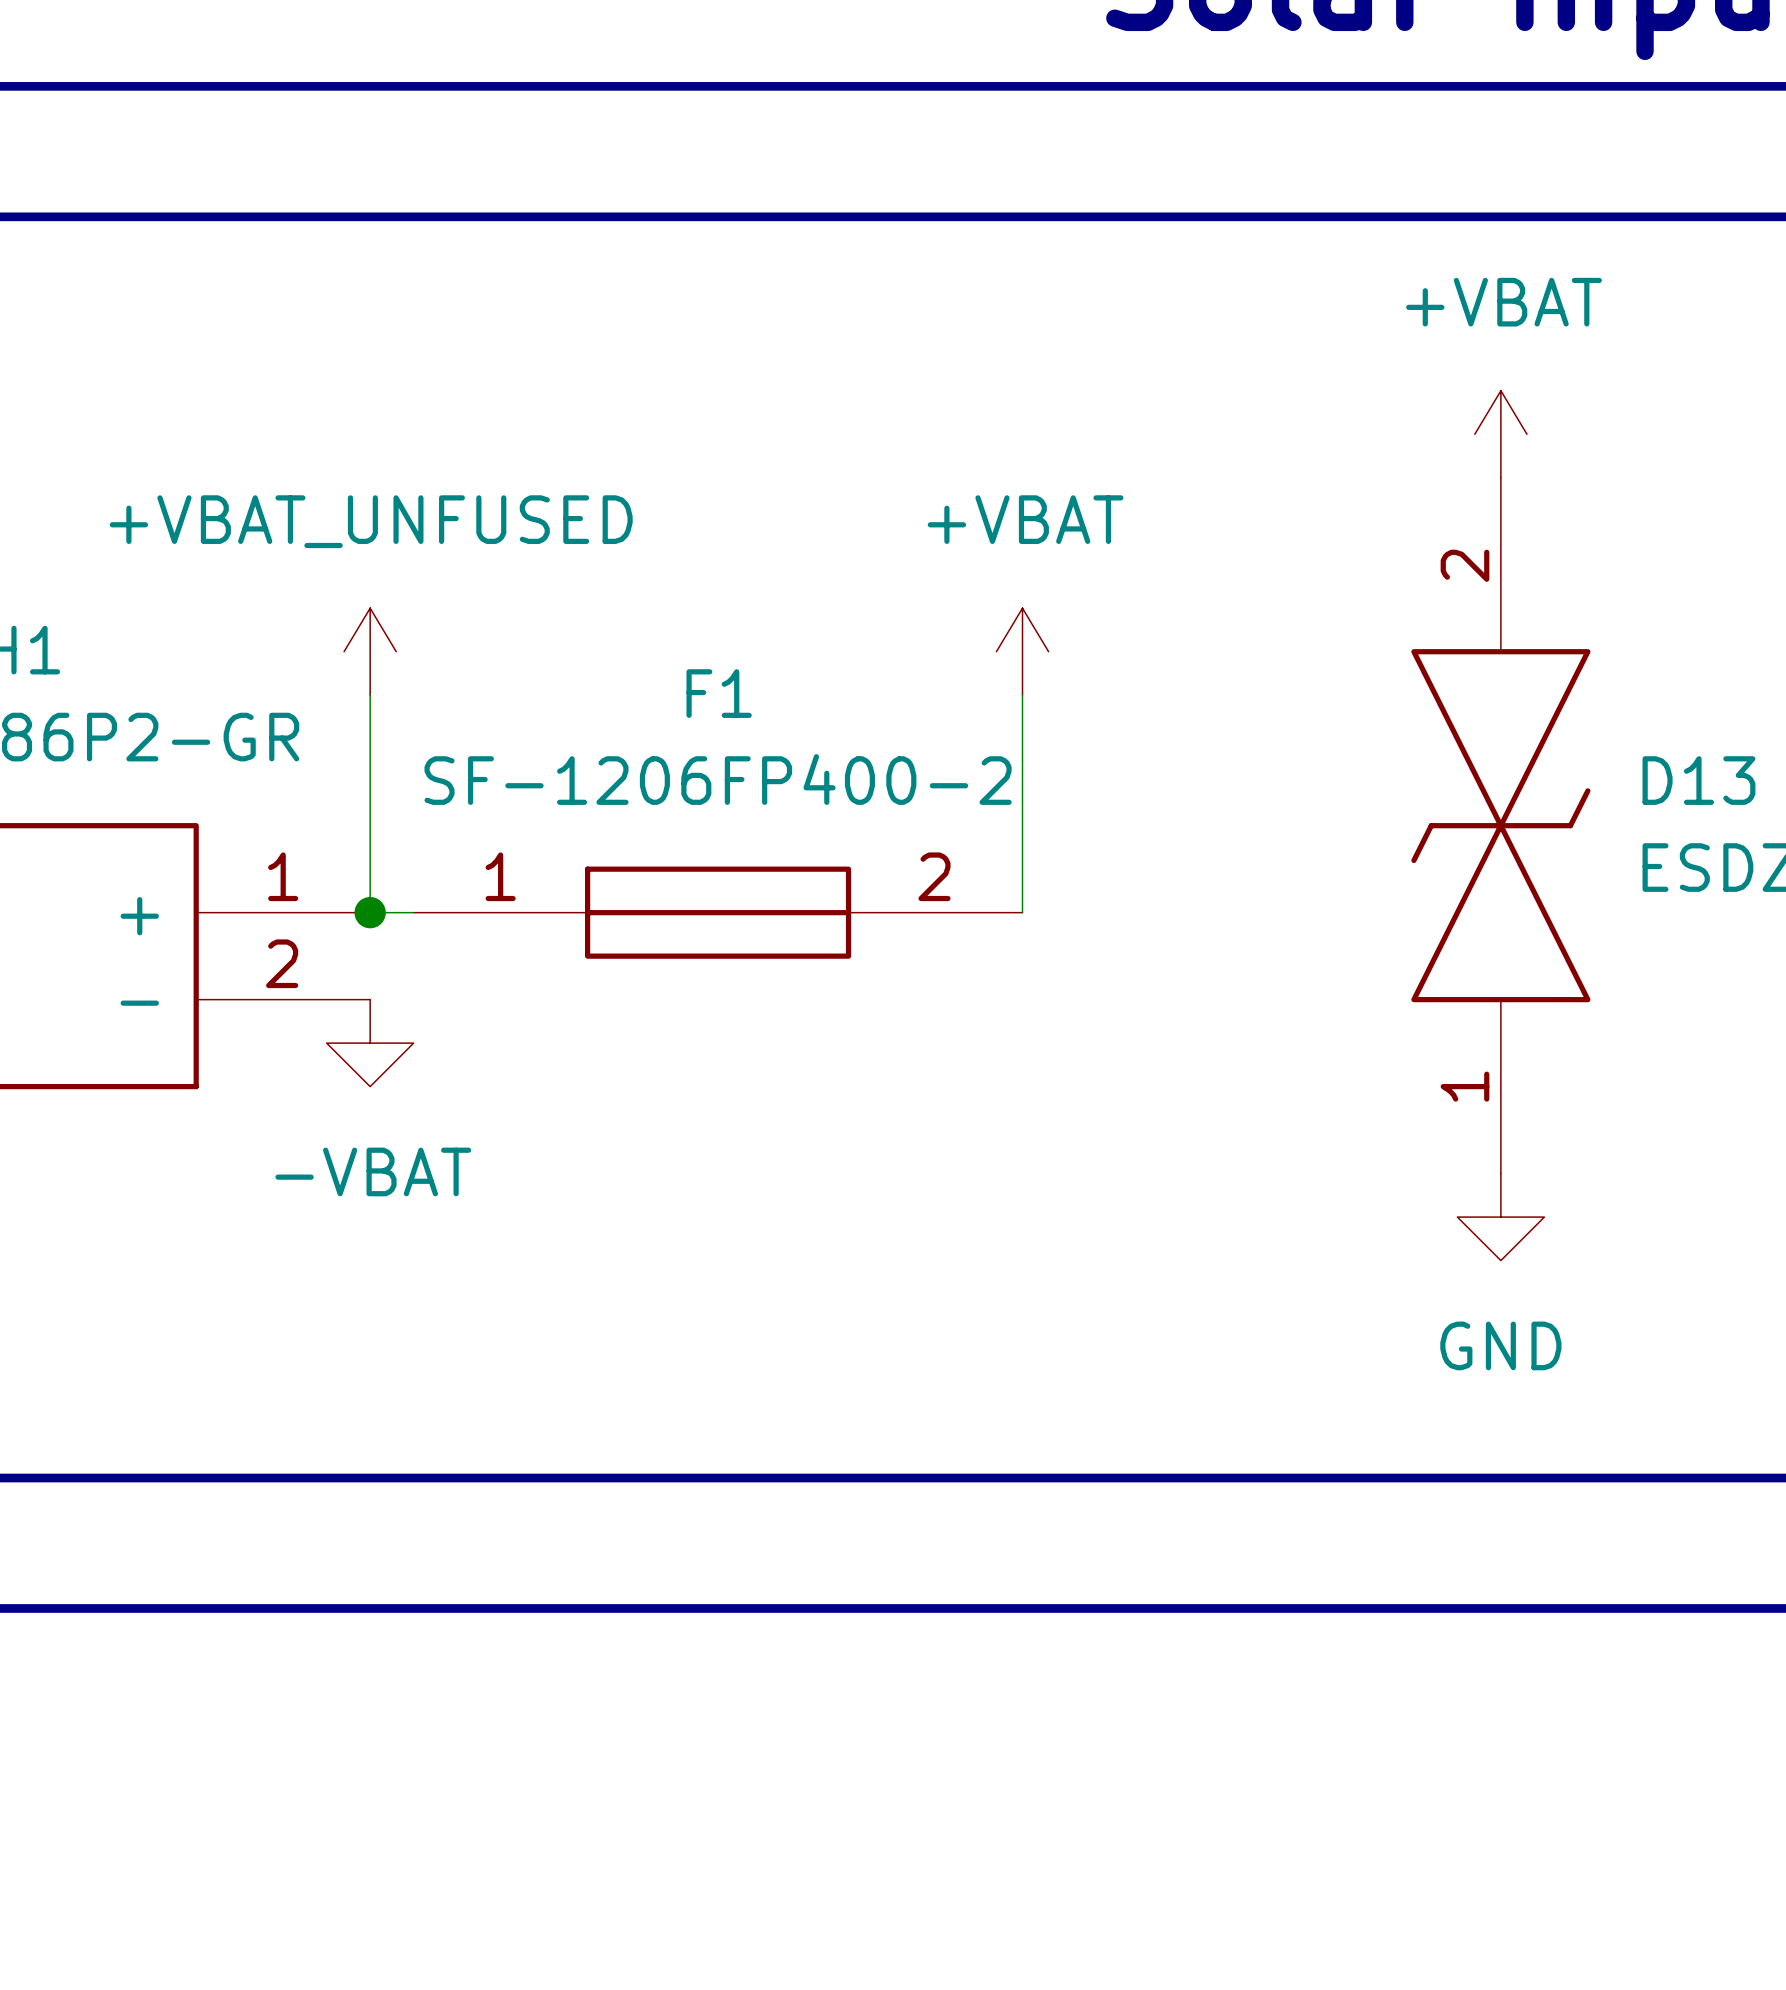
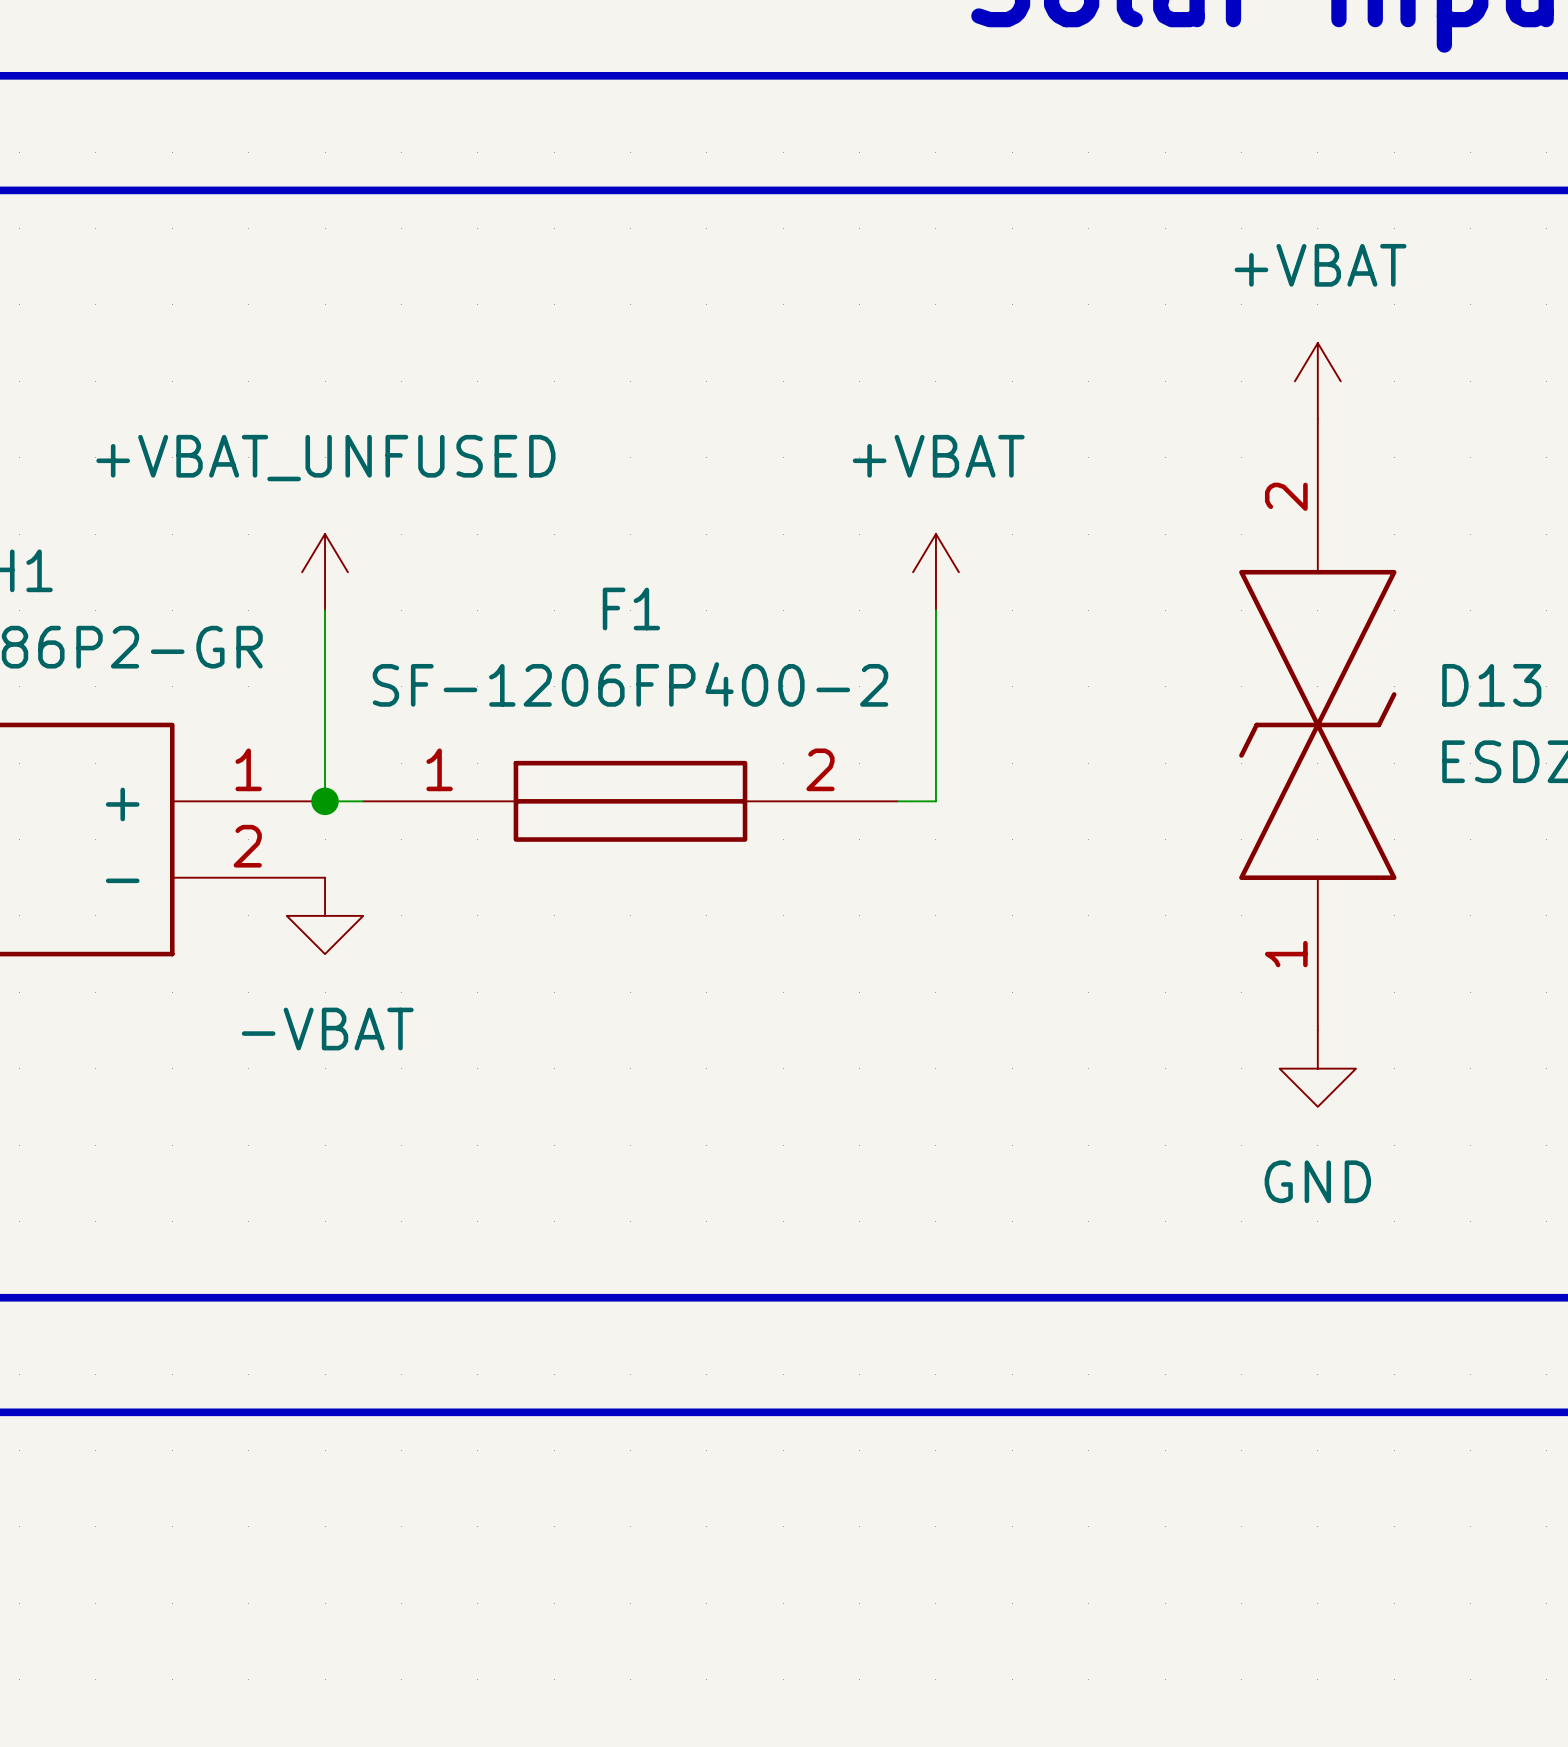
power symbol position: +VBAT (1022, 651) -> +VBAT (935, 572)
wire: (1022, 695) (1022, 912) -> (935, 610) (935, 801) (897, 801)

